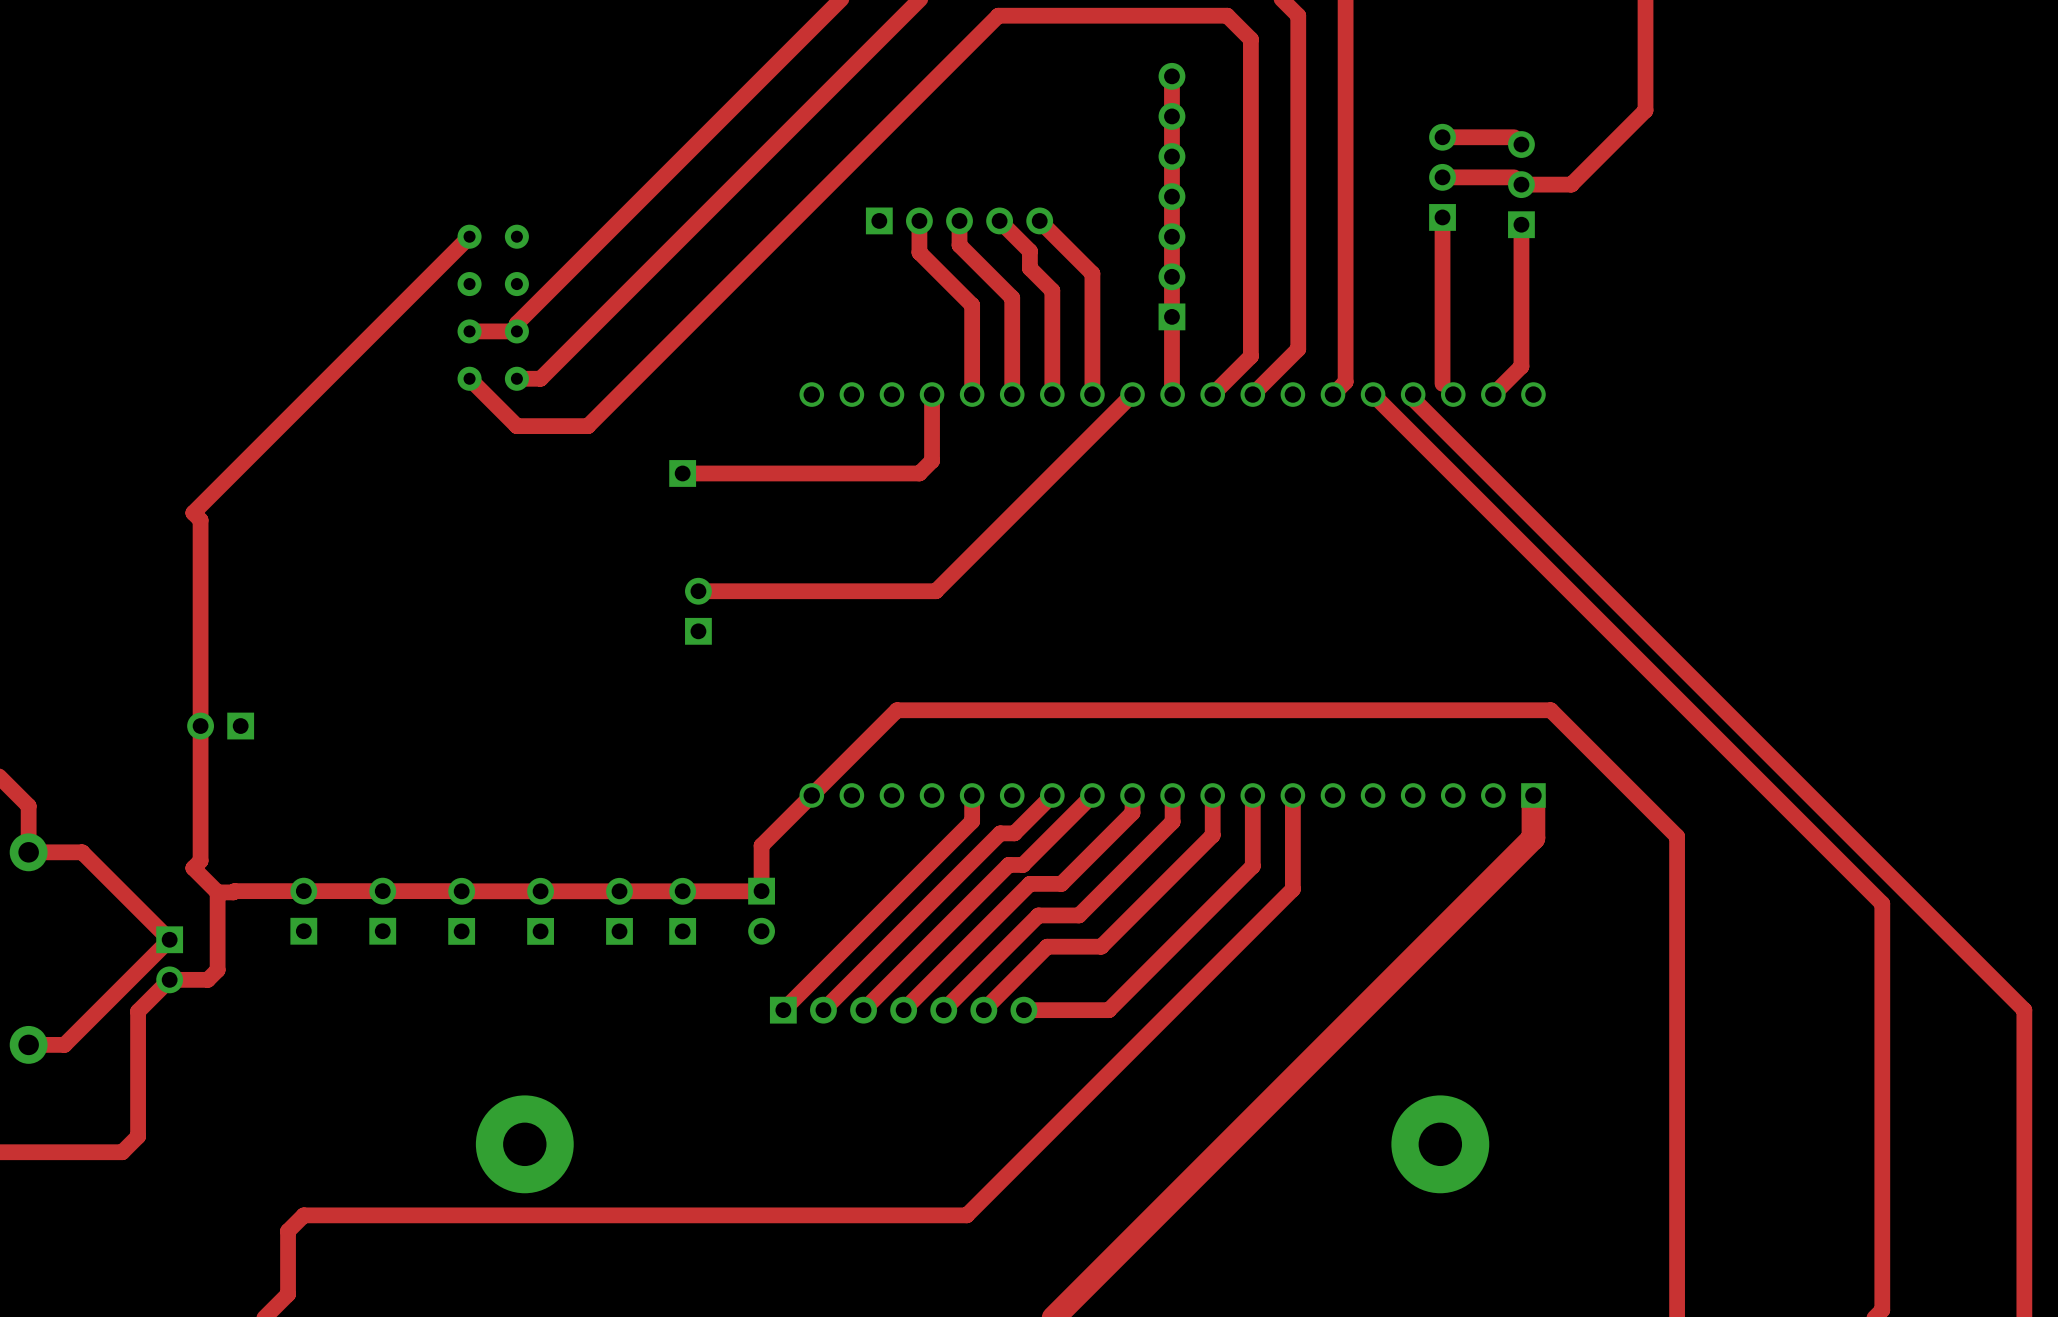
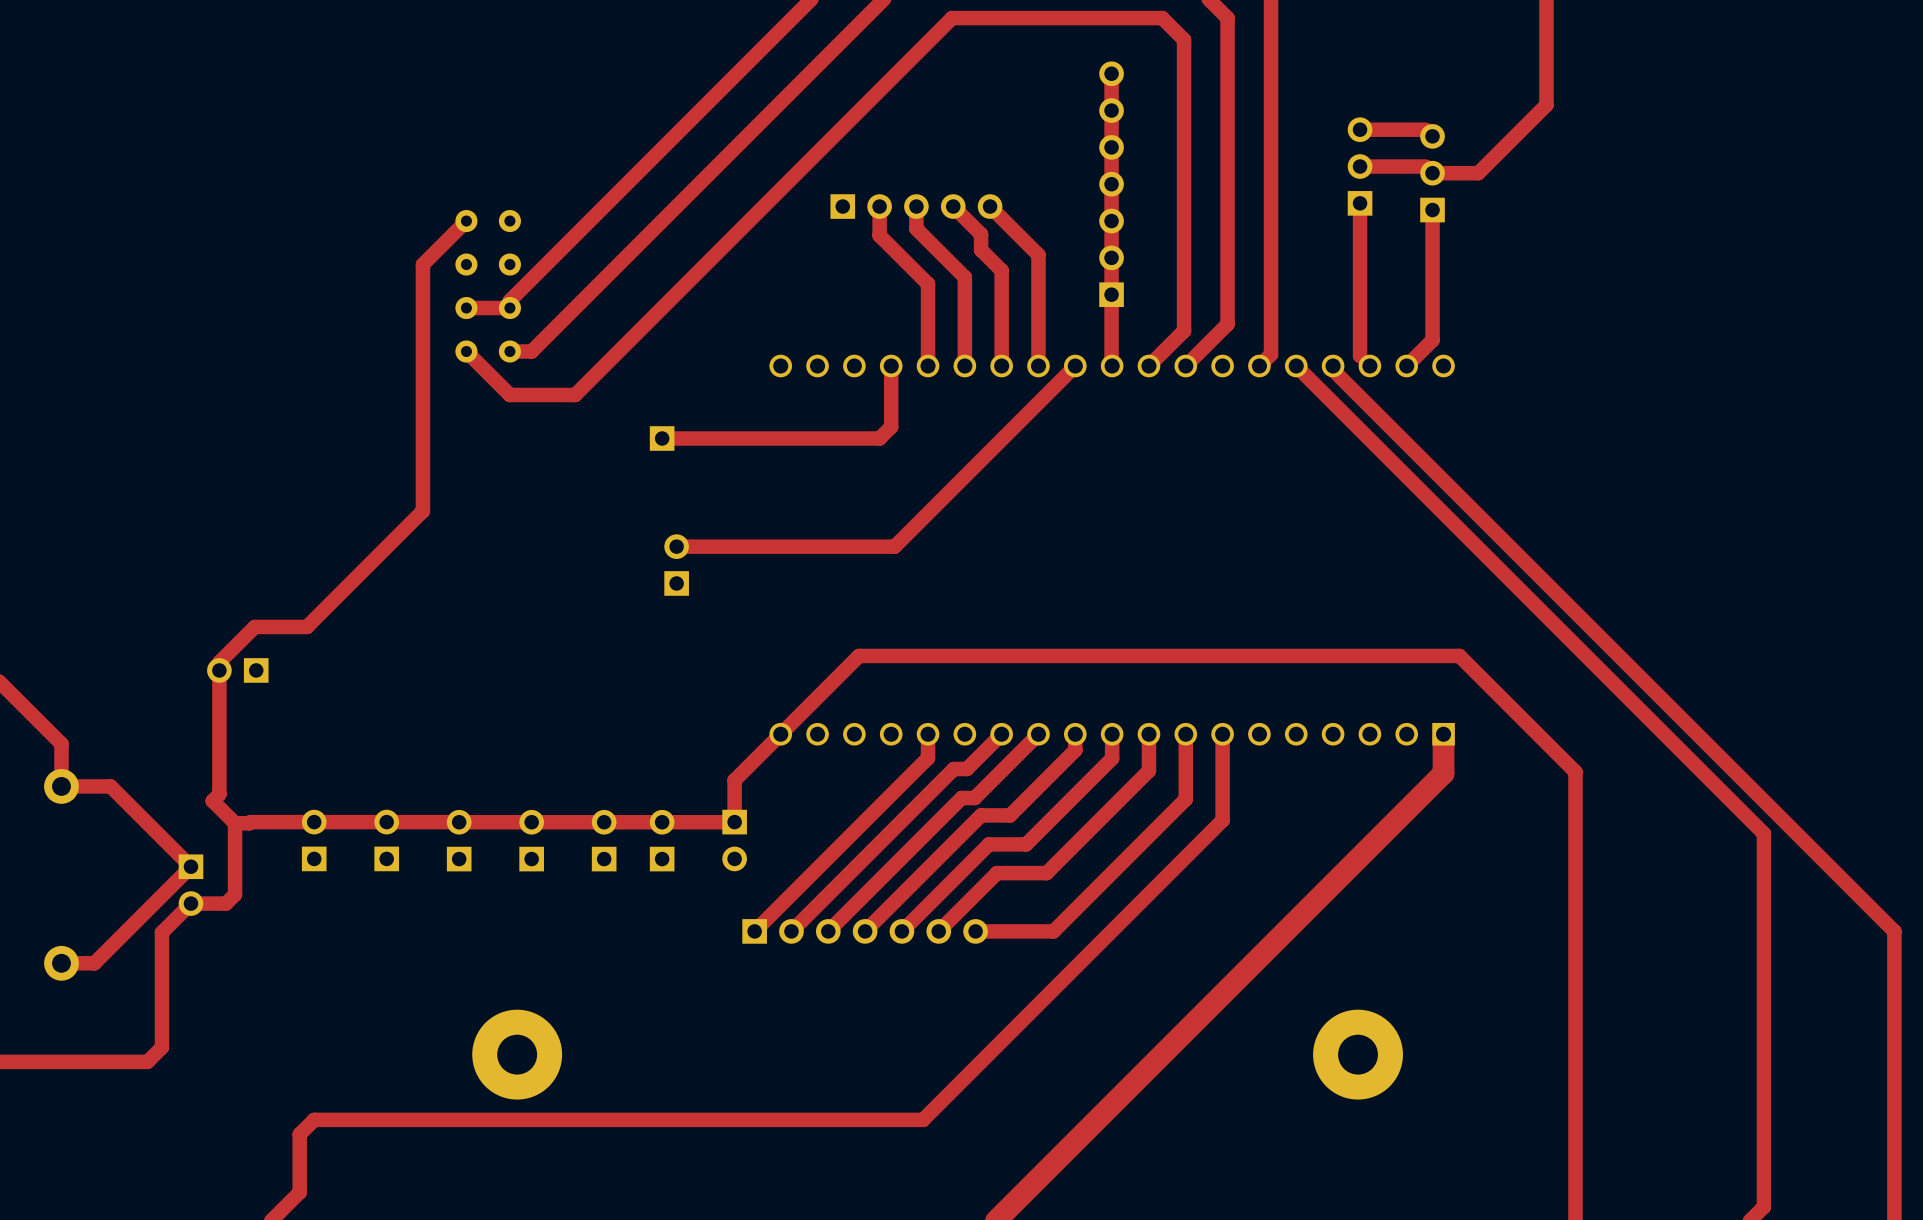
top track: (422, 284) (193, 512) (200, 520) (200, 717) -> (422, 264) (422, 510) (306, 626) (254, 626) (219, 662)

